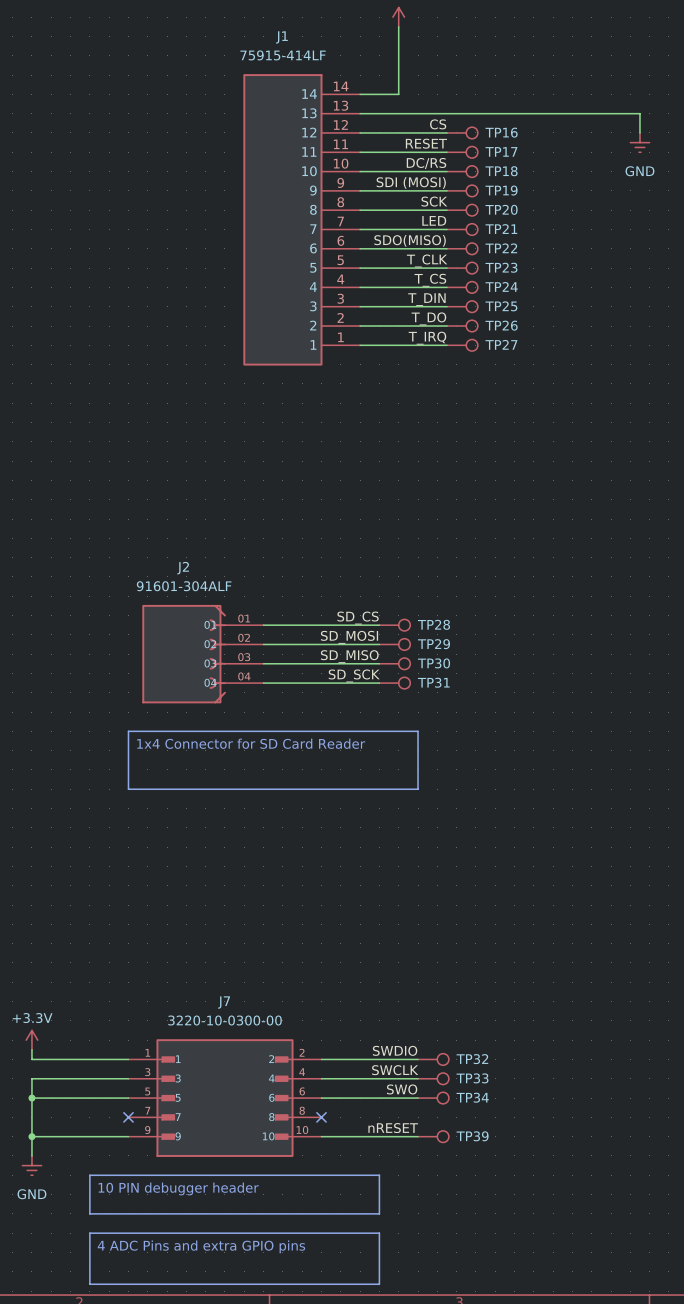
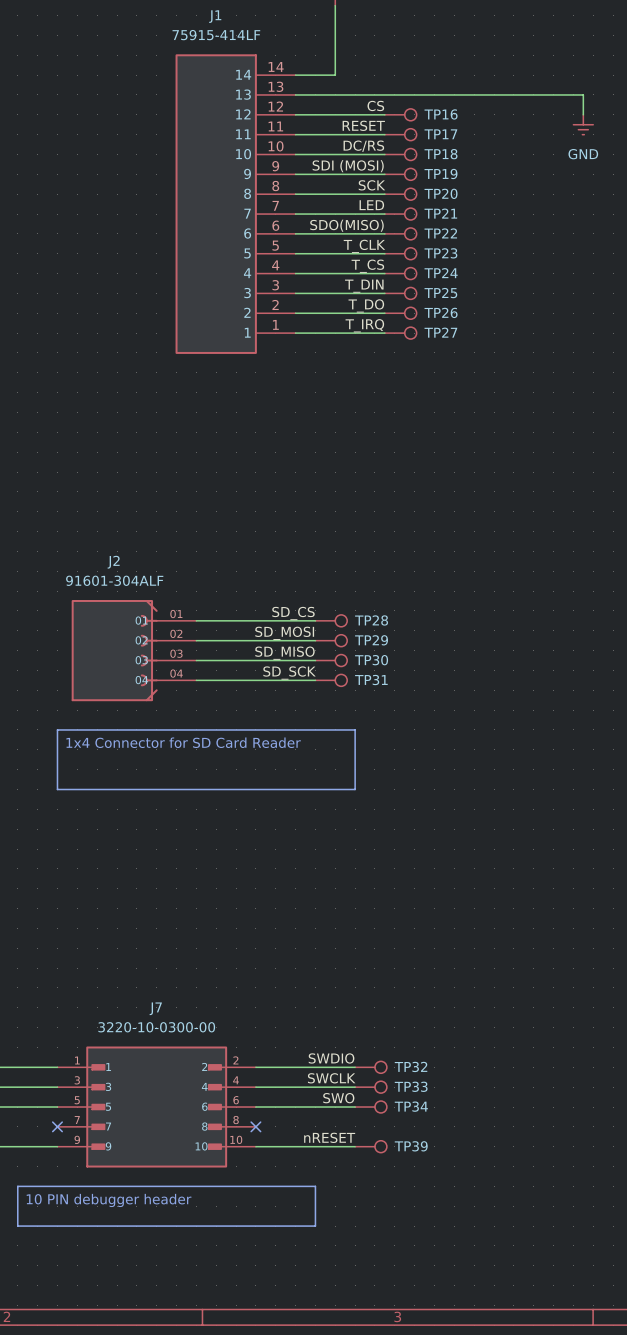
line: (89, 1233) (379, 1233) (379, 1284) (89, 1284) (89, 1233) -> none
text: 4 ADC Pins and extra GPIO pins (201, 1246) -> none

